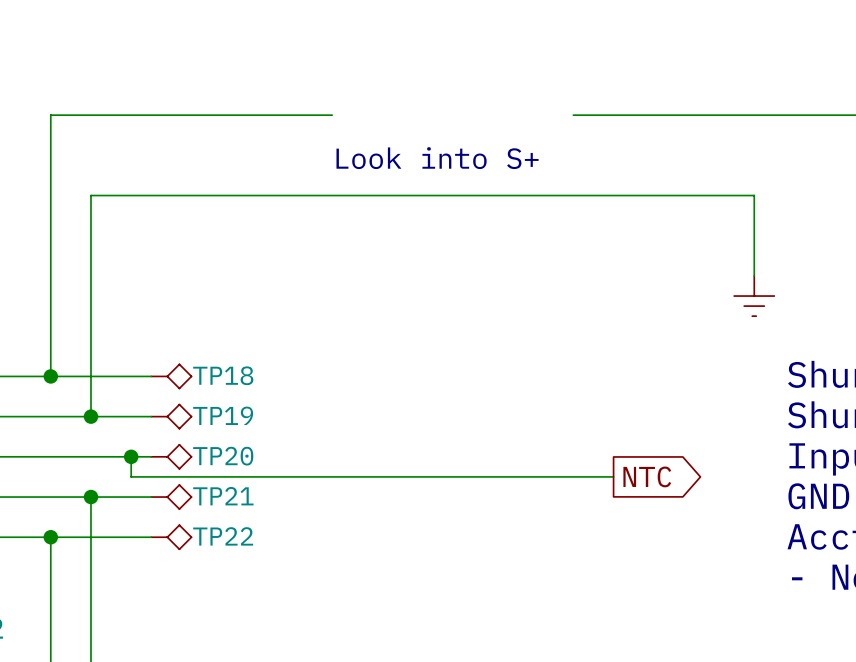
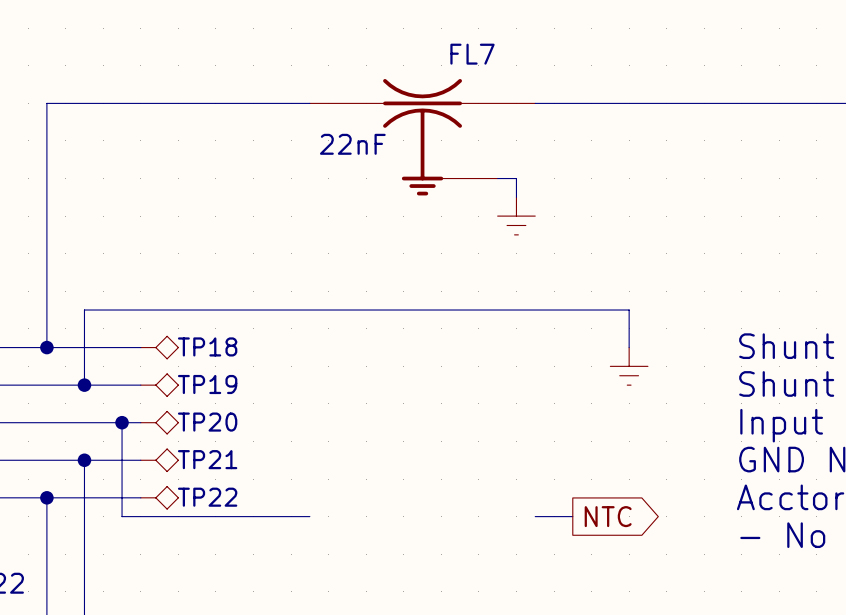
FL7: none -> 22nF (422, 137)
text: Look into S+ (437, 158) -> none
wire: (533, 195) (90, 195) (90, 336) -> (629, 347) (629, 310) (84, 310)
wire: (553, 195) (754, 195) (754, 275) -> (516, 178) (516, 197)
power symbol: none -> (516, 216)
power symbol: (754, 296) -> none
power symbol: none -> (629, 366)
wire: (131, 476) (613, 476) -> (122, 441) (122, 516) (309, 516)
global label position: NTC (647, 476) -> NTC (608, 516)
wire: none -> (535, 516) (572, 516)

